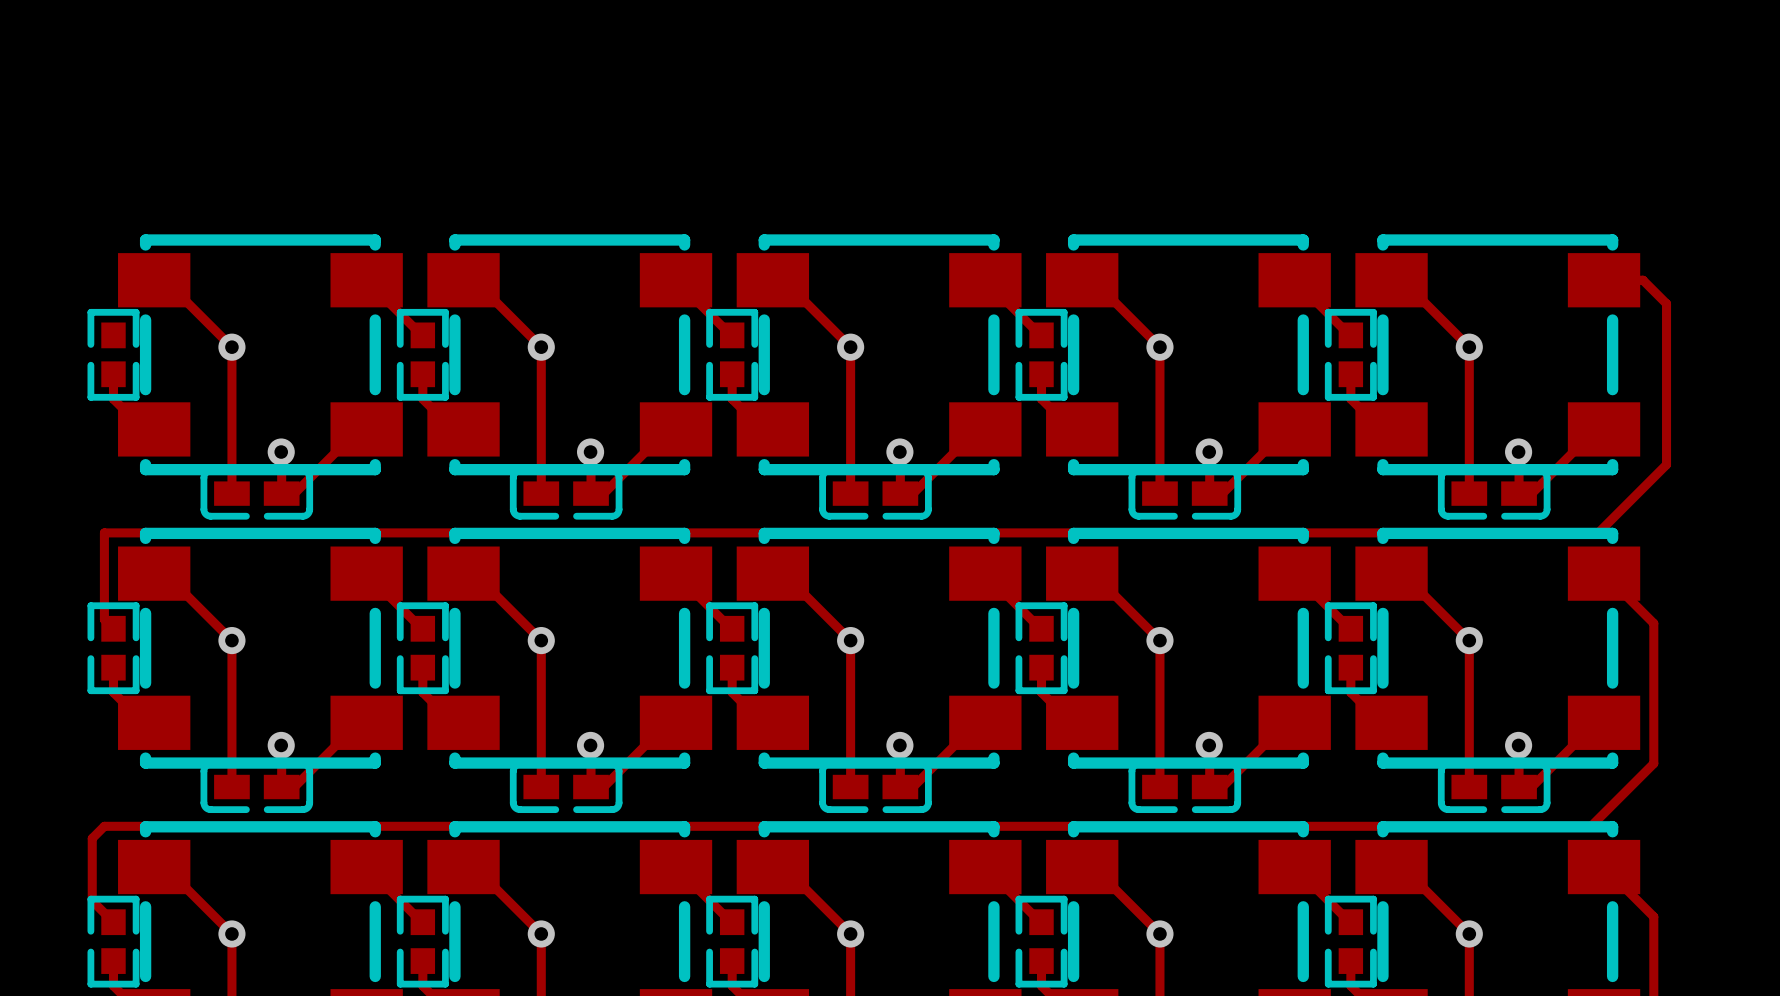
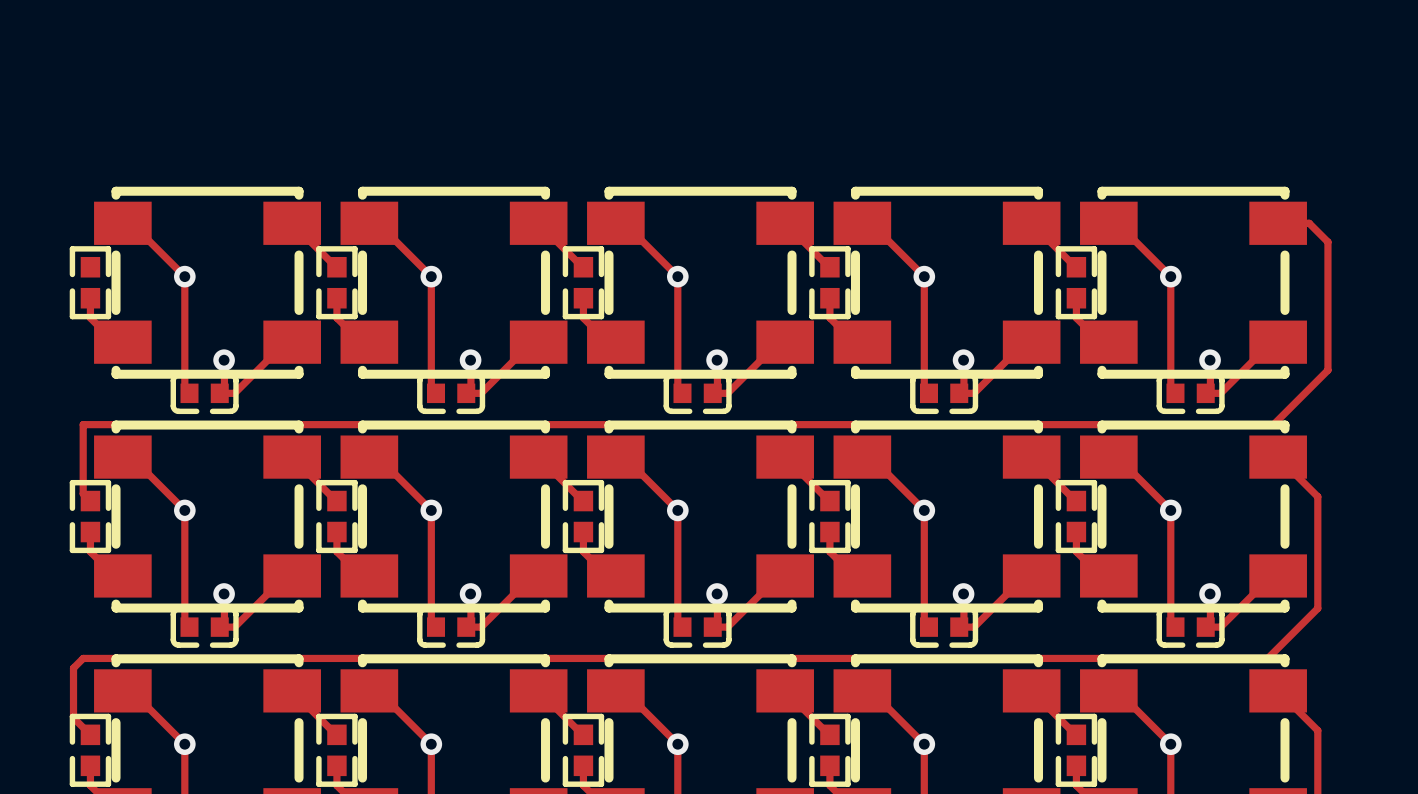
part footprint: [200, 467, 314, 520] -> [170, 372, 239, 415]
part footprint: [509, 467, 623, 520] -> [417, 372, 486, 415]
part footprint: [819, 467, 932, 520] -> [663, 372, 732, 415]
part footprint: [1128, 467, 1242, 520] -> [910, 372, 979, 415]
part footprint: [1437, 467, 1551, 520] -> [1156, 372, 1225, 415]
part footprint: [200, 761, 314, 814] -> [170, 606, 239, 648]
part footprint: [509, 761, 623, 814] -> [417, 606, 486, 648]
part footprint: [819, 761, 932, 814] -> [663, 606, 732, 648]
part footprint: [1128, 761, 1242, 814] -> [910, 606, 979, 648]
part footprint: [1437, 761, 1551, 814] -> [1156, 606, 1225, 648]

